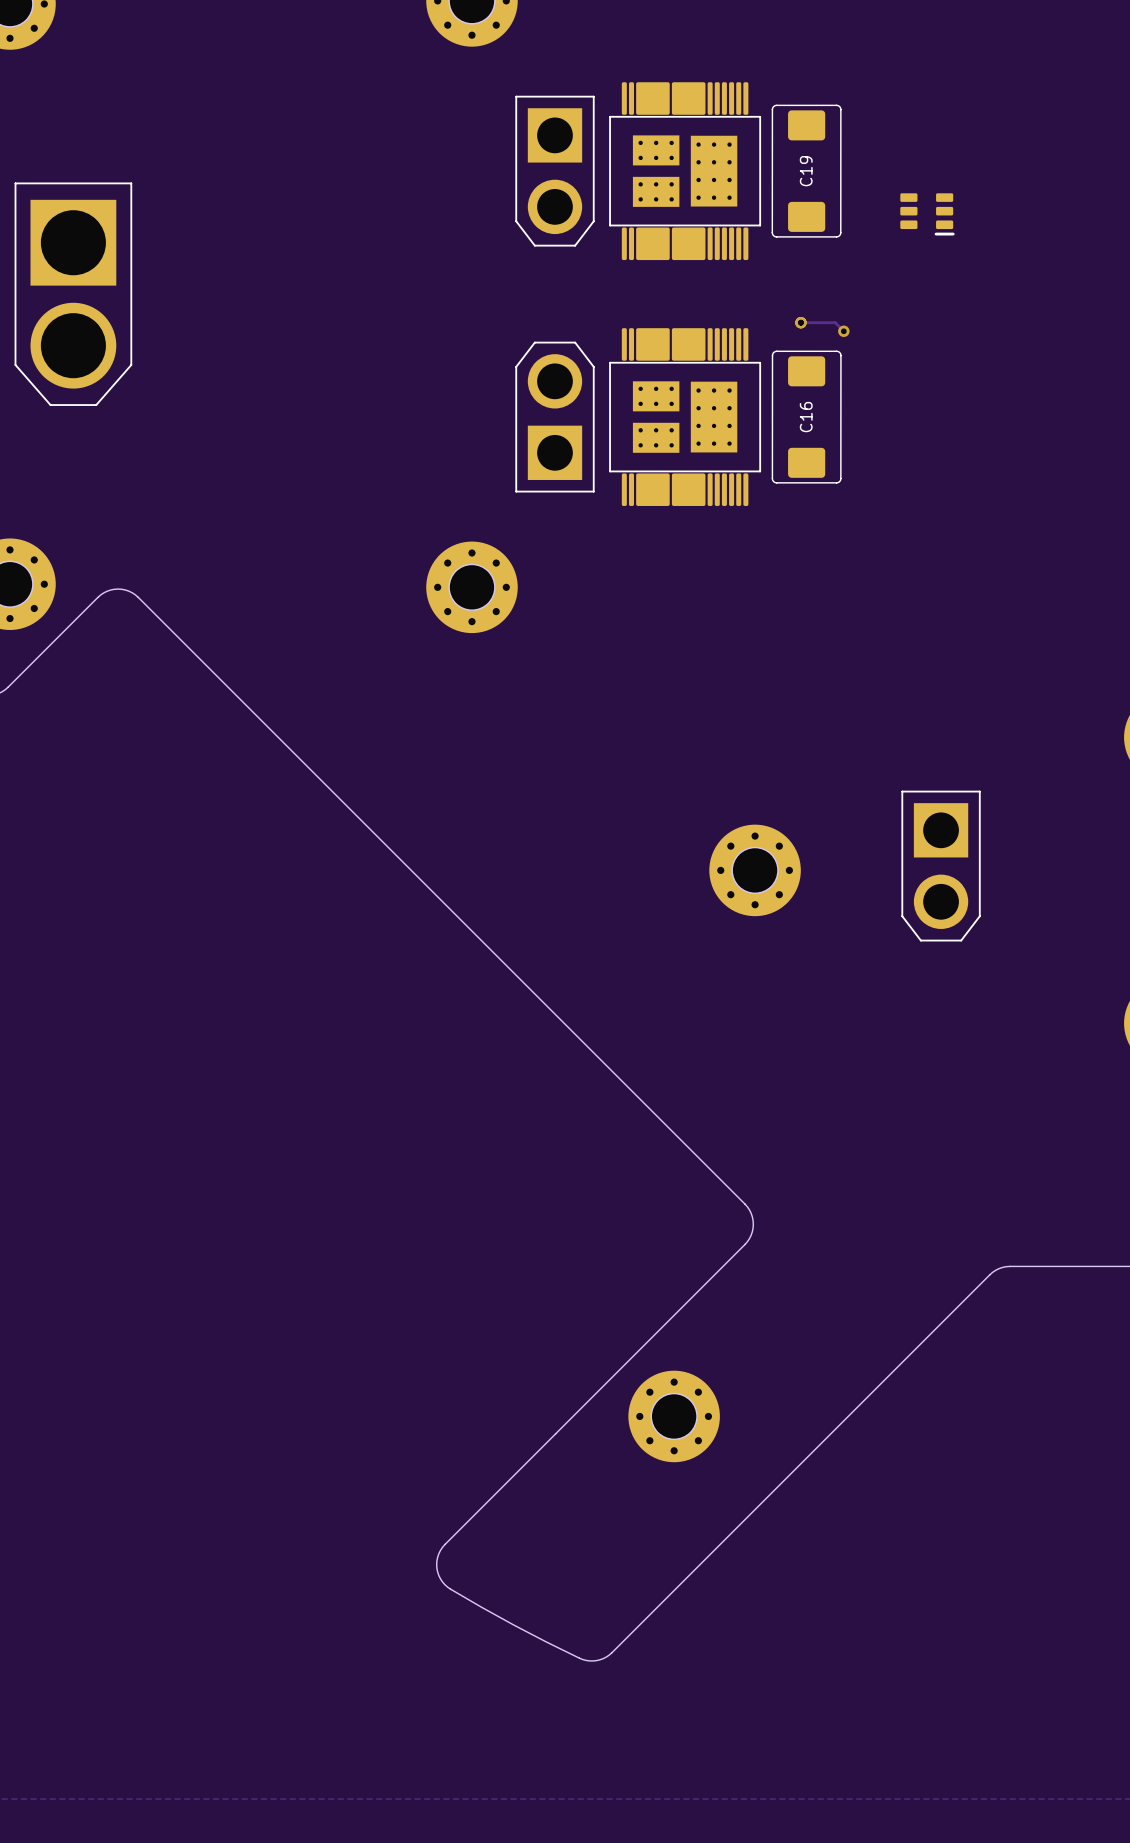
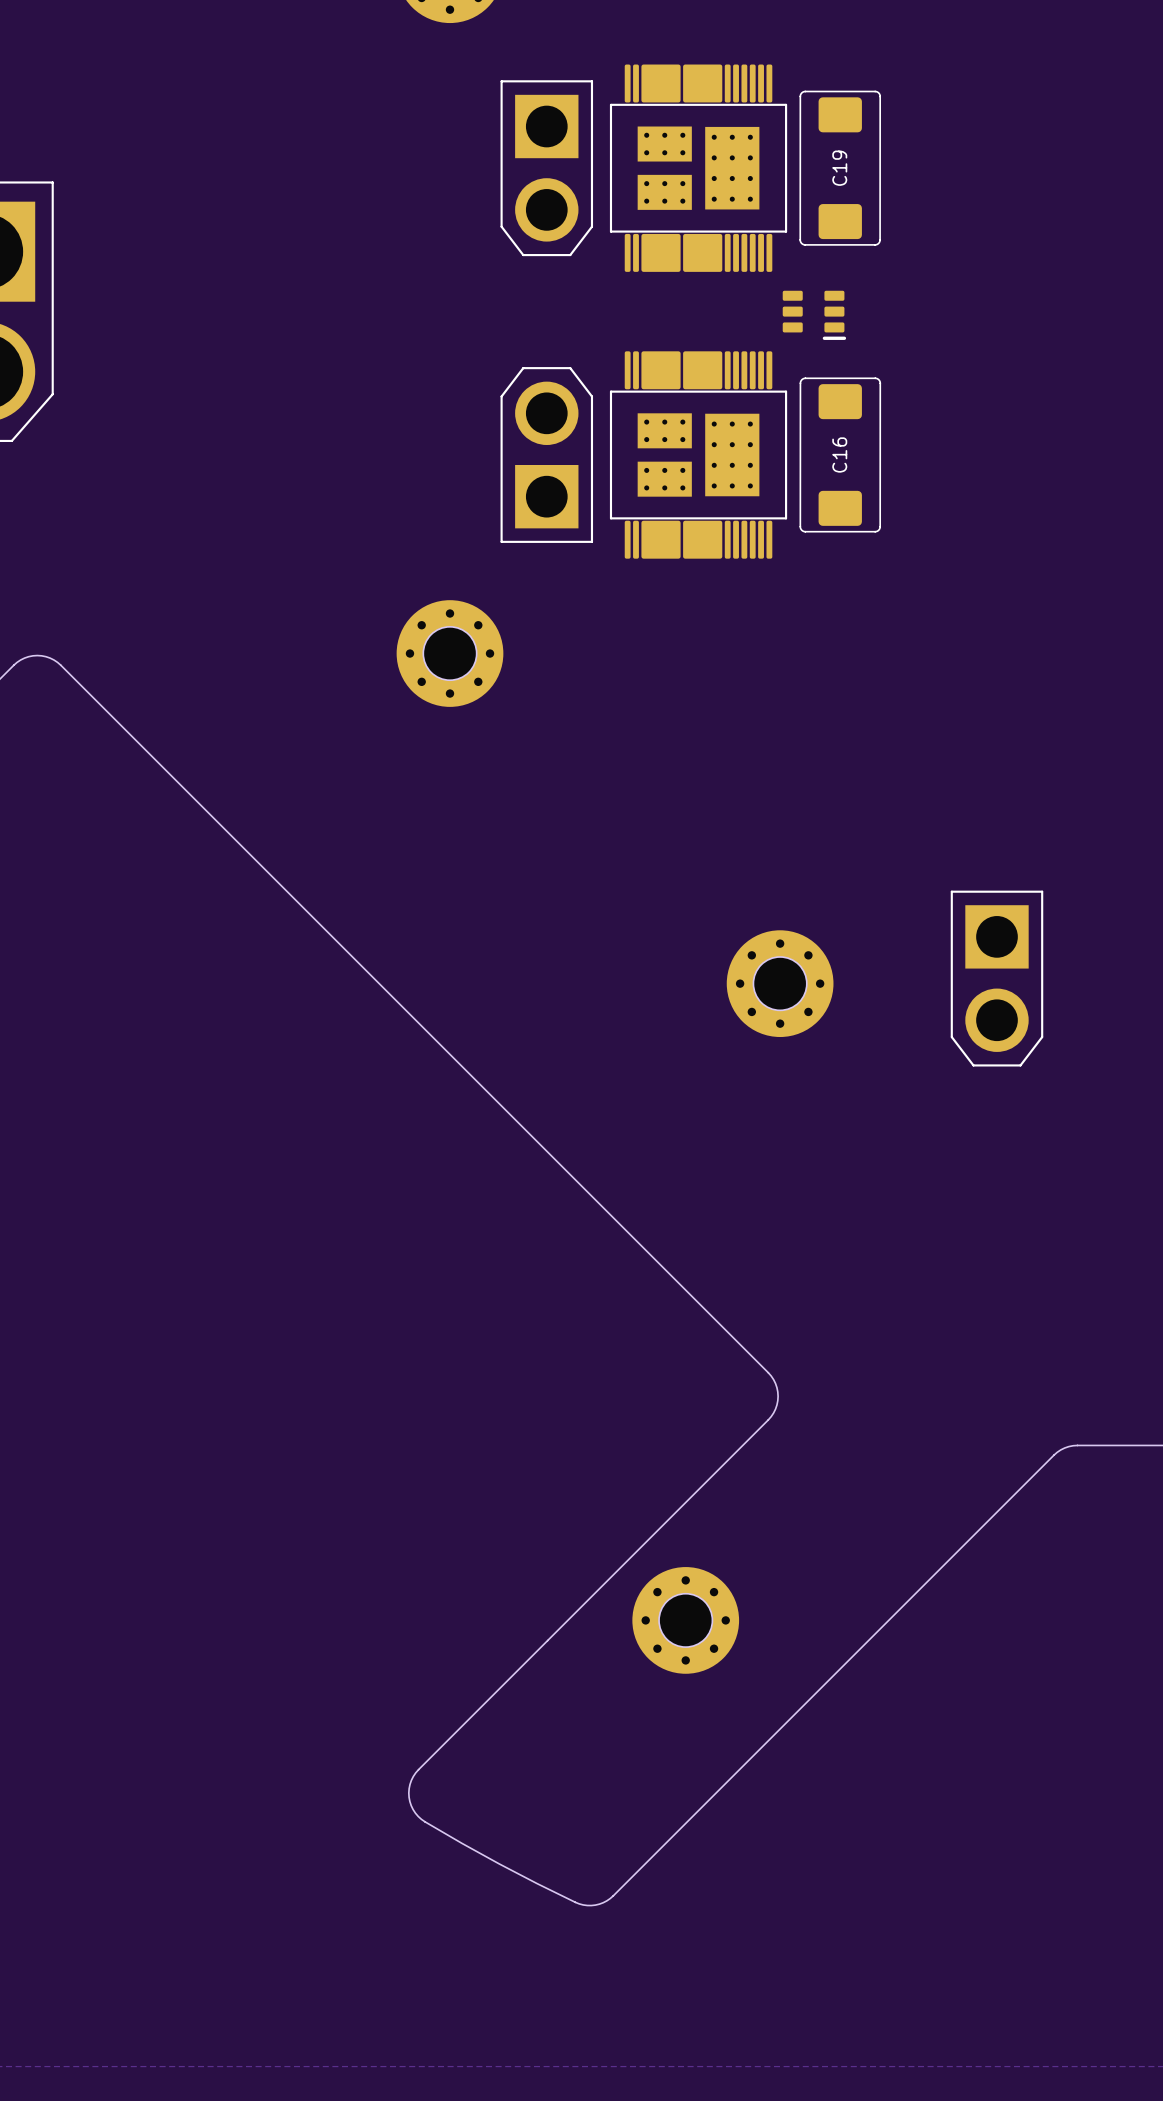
part position: (927, 214) -> (814, 315)
track: (800, 322) (835, 322) (843, 331) -> none
via: (800, 322) -> none
via: (843, 331) -> none

